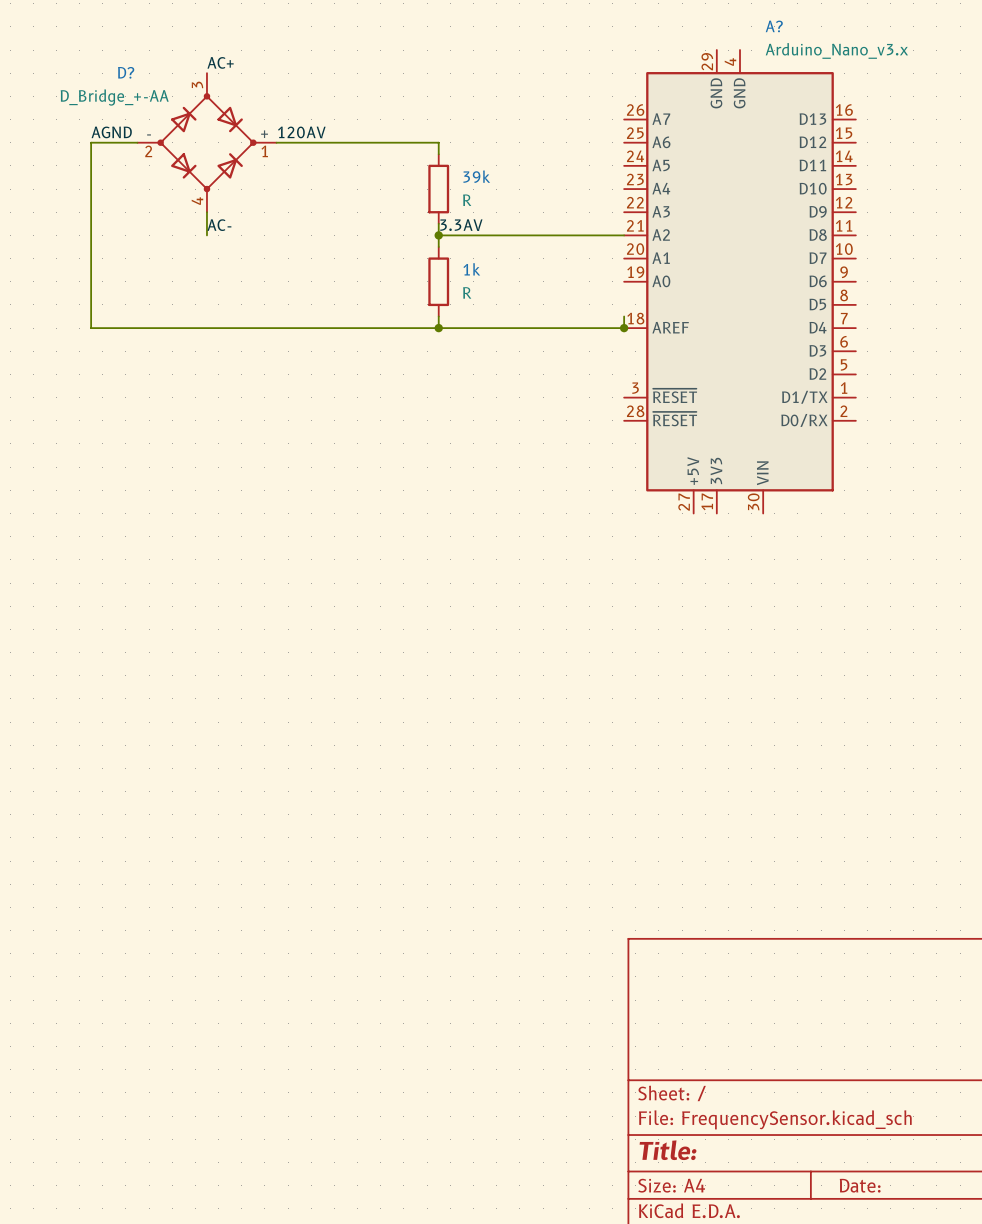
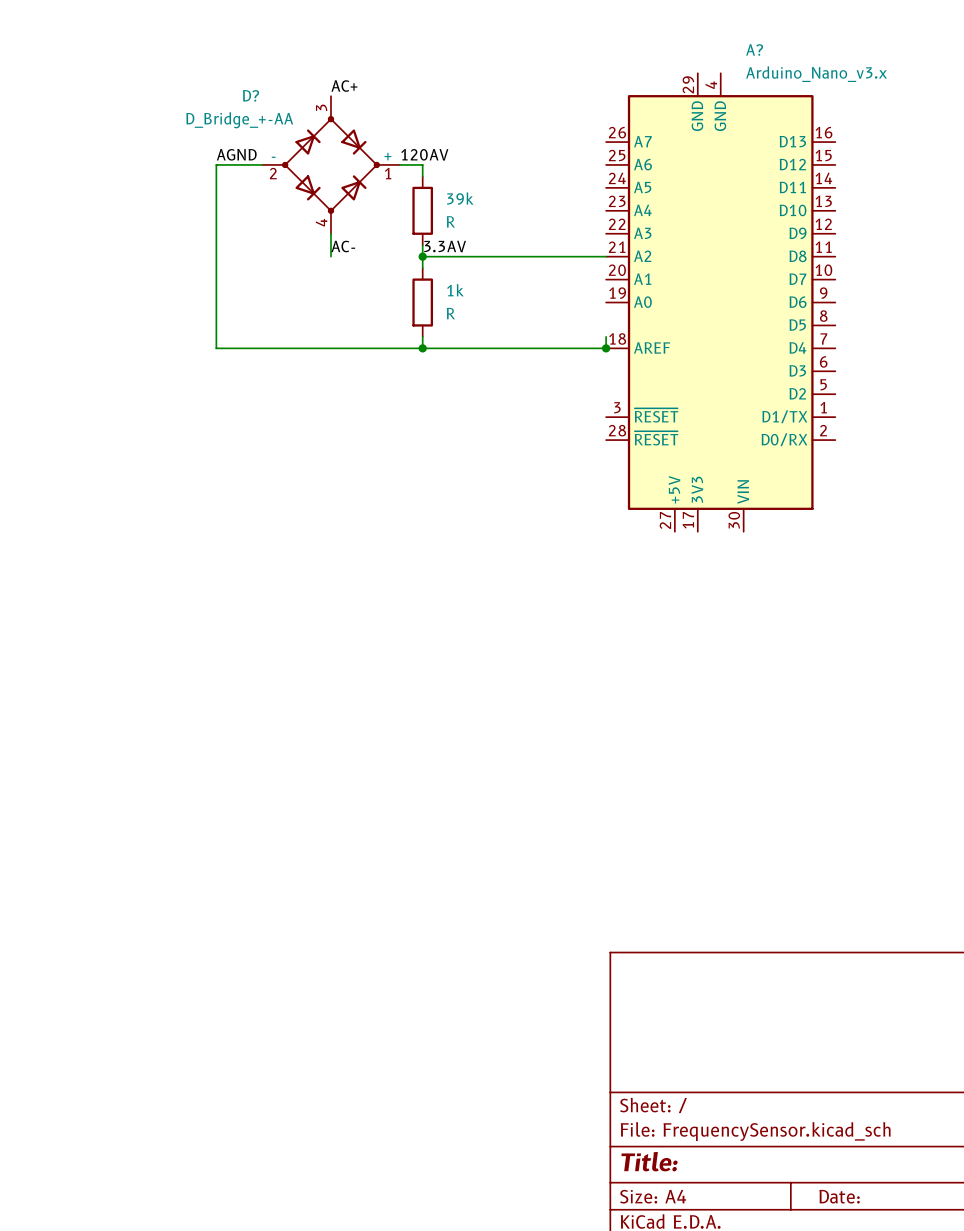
label position: AC+ (220, 62) -> AC+ (344, 86)
label position: AGND (111, 132) -> AGND (236, 154)
label position: 120AV (301, 132) -> 120AV (424, 154)
wire: (137, 142) (91, 142) (91, 328) (230, 328) -> (262, 164) (216, 164) (216, 348)
D? position: (206, 142) -> (330, 164)
wire: (276, 142) (415, 142) -> none
wire: (206, 212) (206, 235) -> (330, 233) (330, 256)
label position: AC- (219, 225) -> AC- (343, 246)

